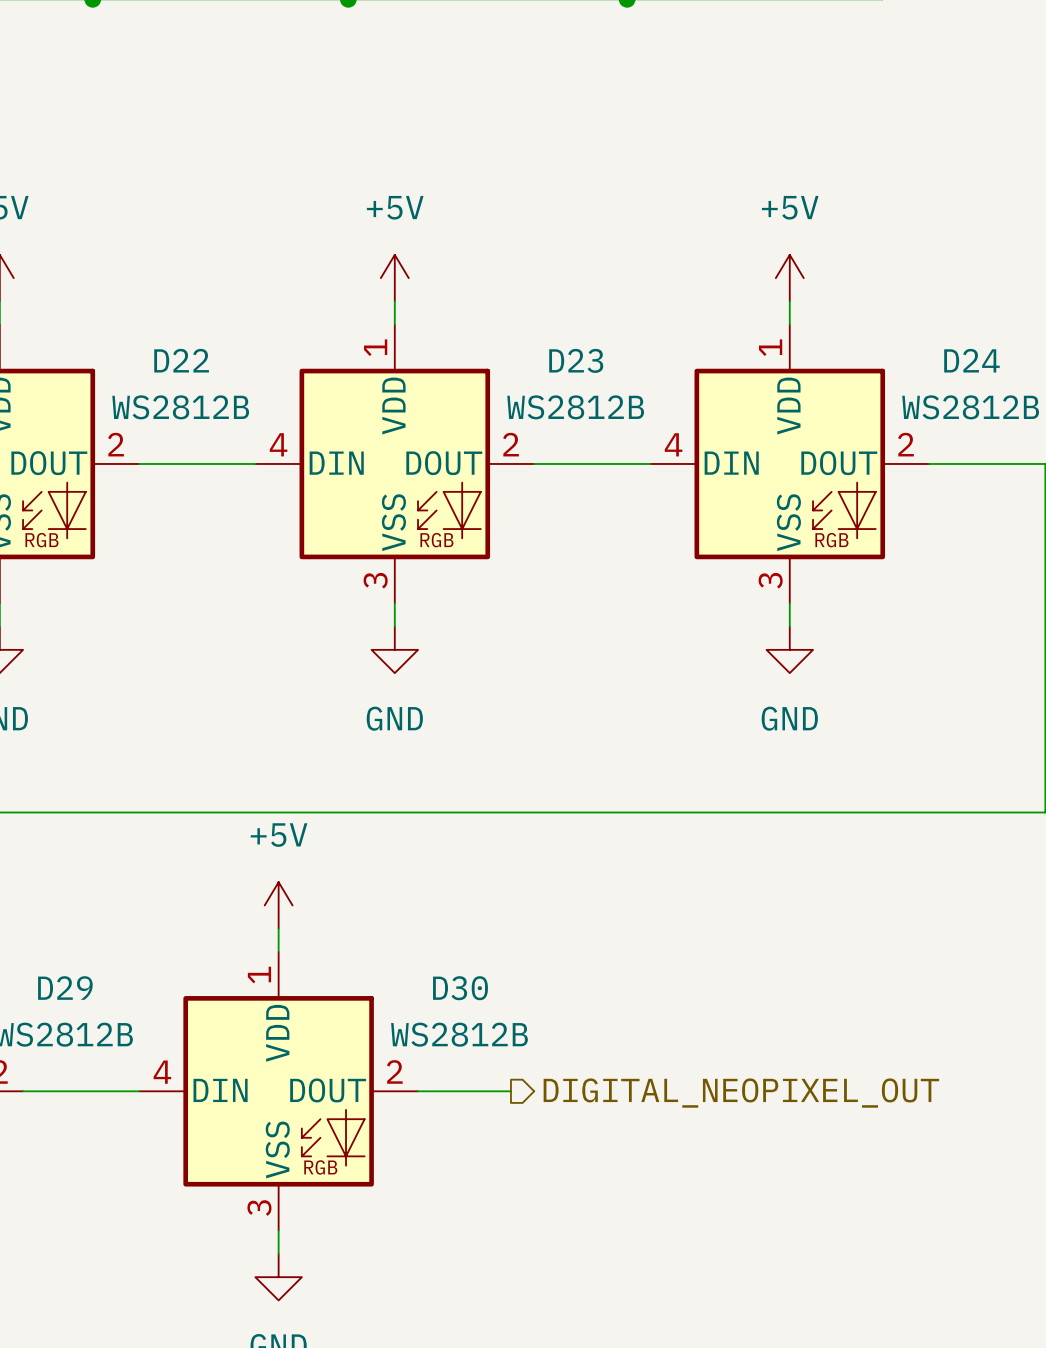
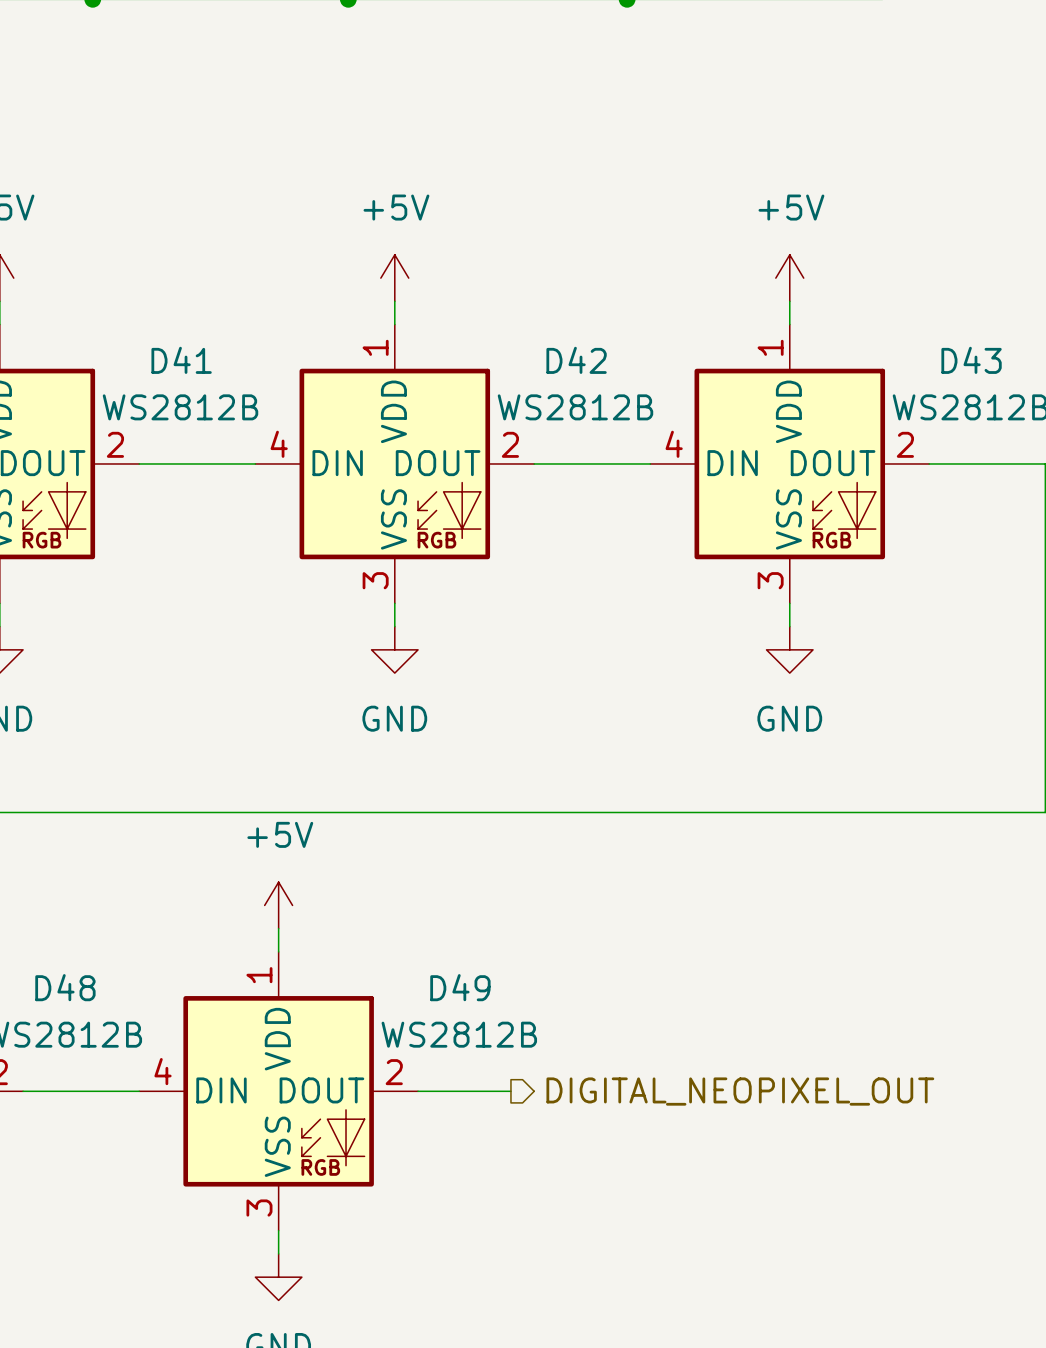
D22 name: D22 (181, 360) -> D41 (181, 360)
D23 name: D23 (576, 360) -> D42 (576, 360)
D24 name: D24 (971, 360) -> D43 (971, 360)
D29 name: D29 (65, 988) -> D48 (65, 987)
D30 name: D30 (460, 988) -> D49 (460, 987)

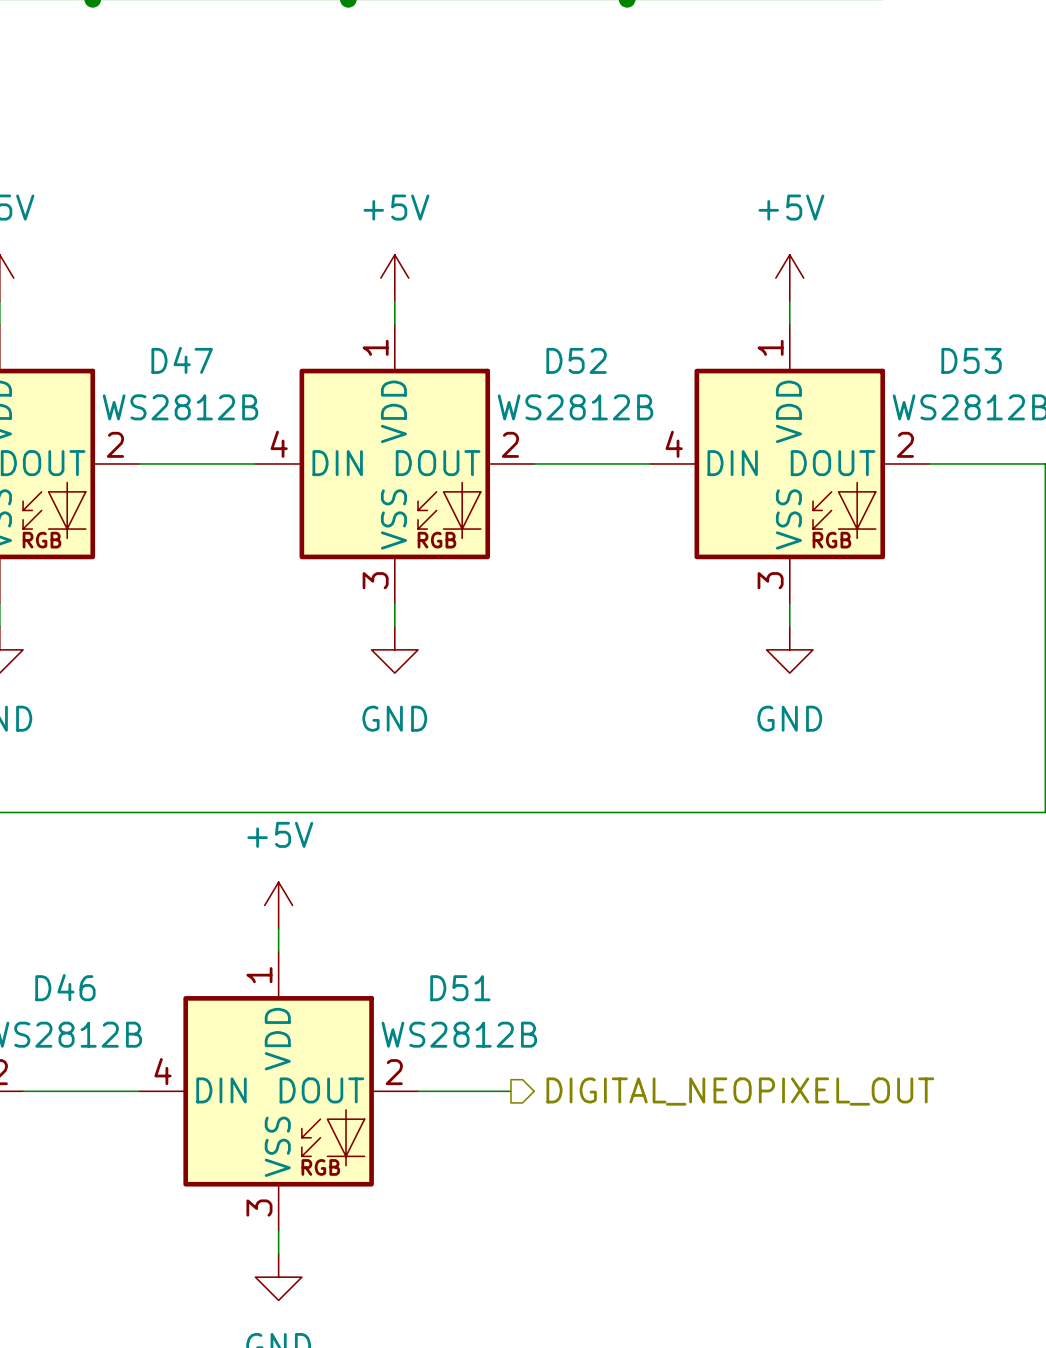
D41 name: D41 (181, 360) -> D47 (182, 360)
D42 name: D42 (576, 360) -> D52 (576, 360)
D43 name: D43 (971, 360) -> D53 (971, 360)
D48 name: D48 (65, 987) -> D46 (65, 987)
D49 name: D49 (460, 987) -> D51 (460, 988)

